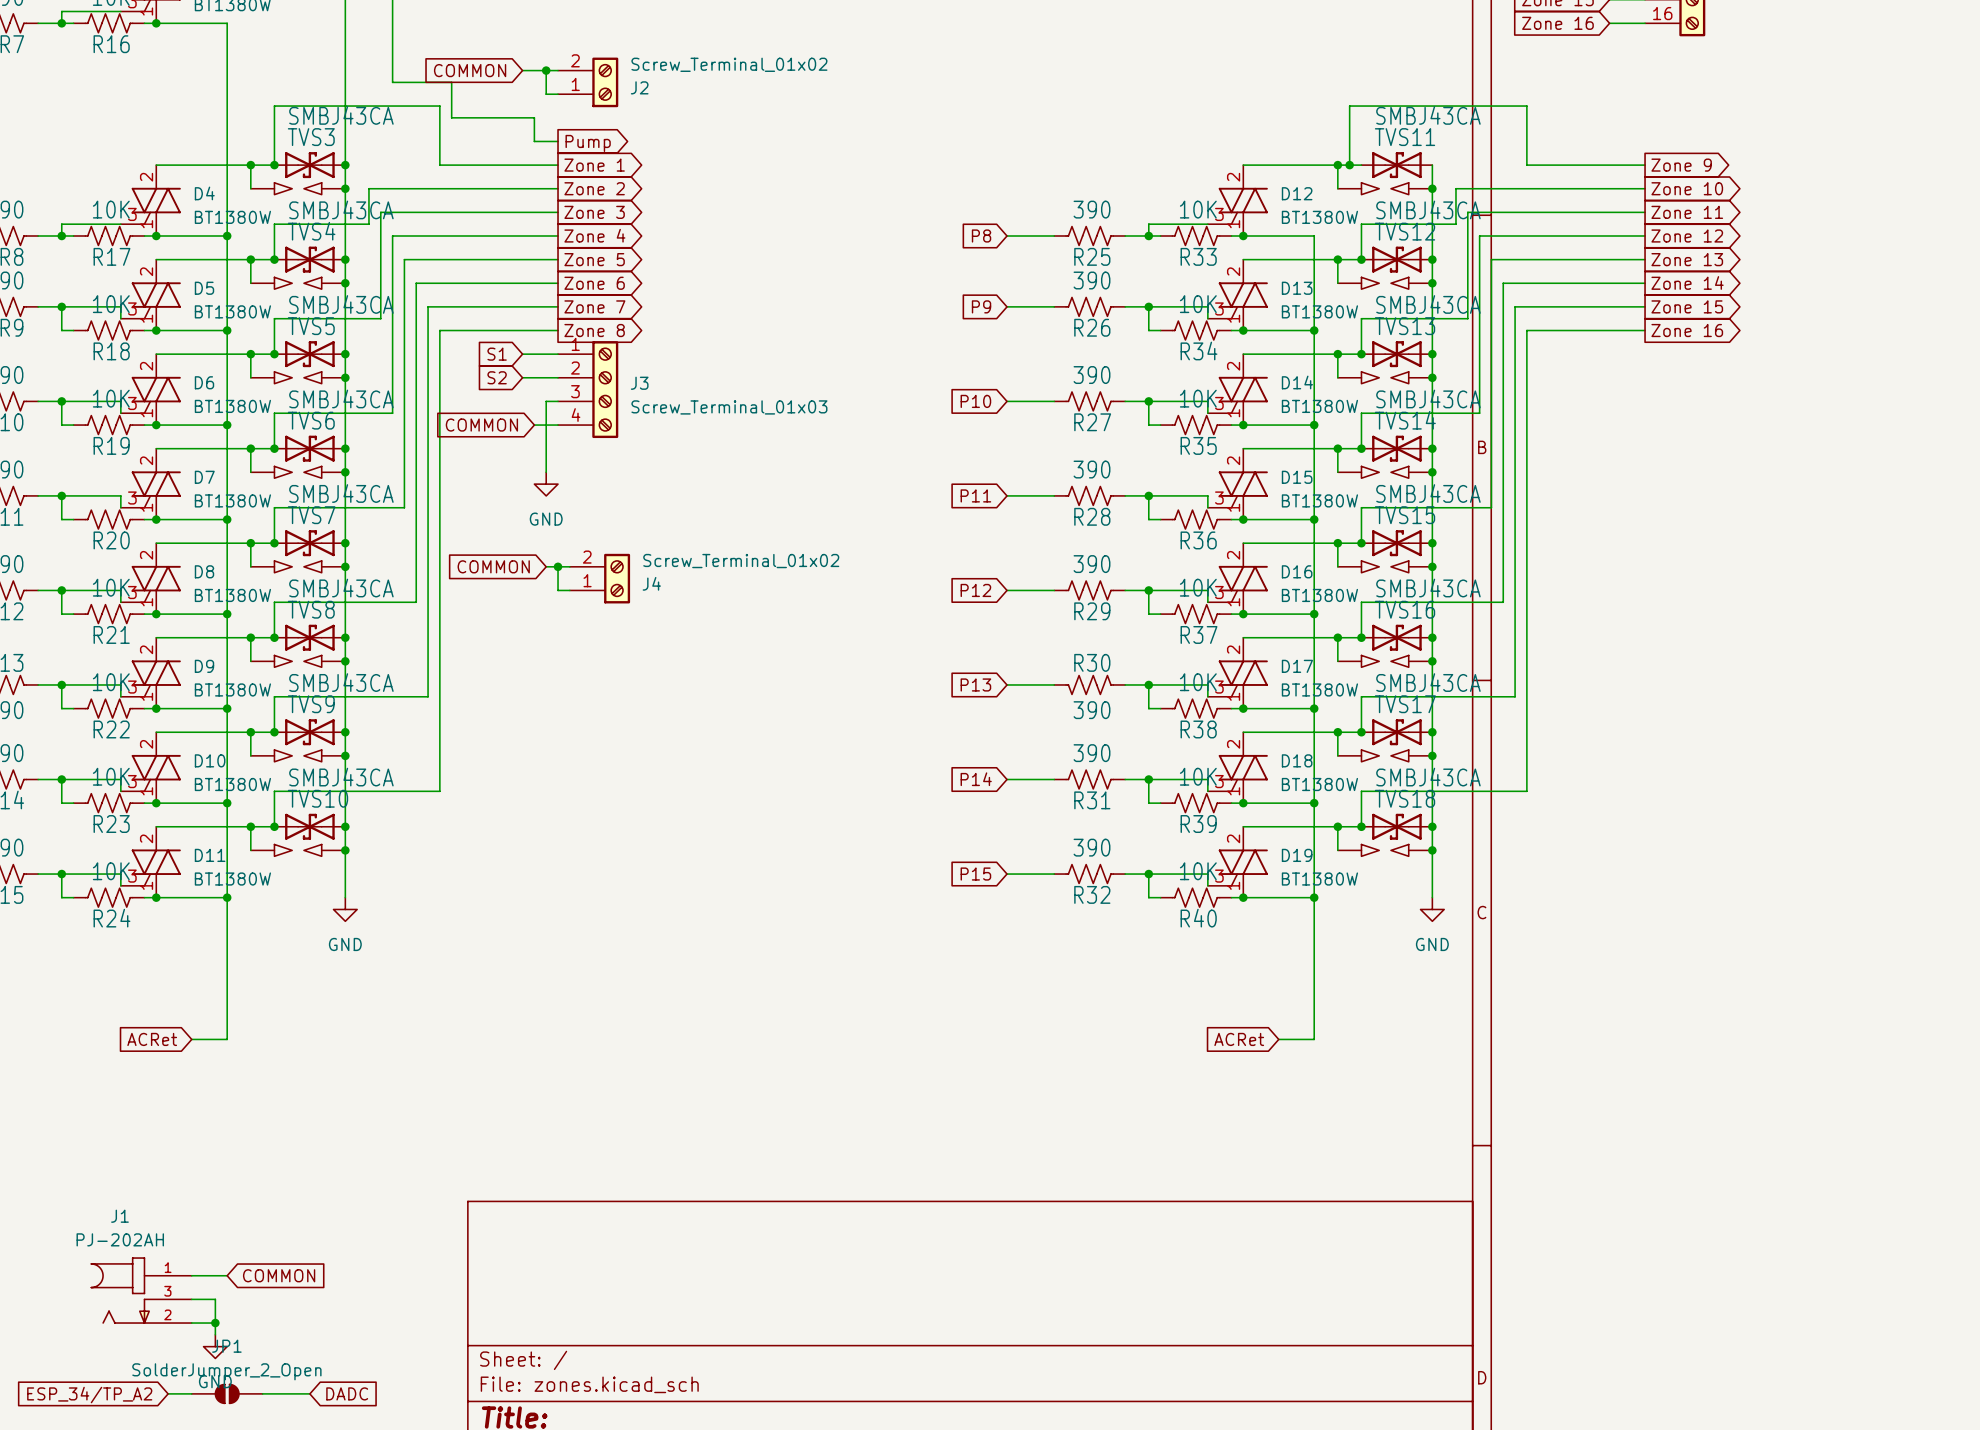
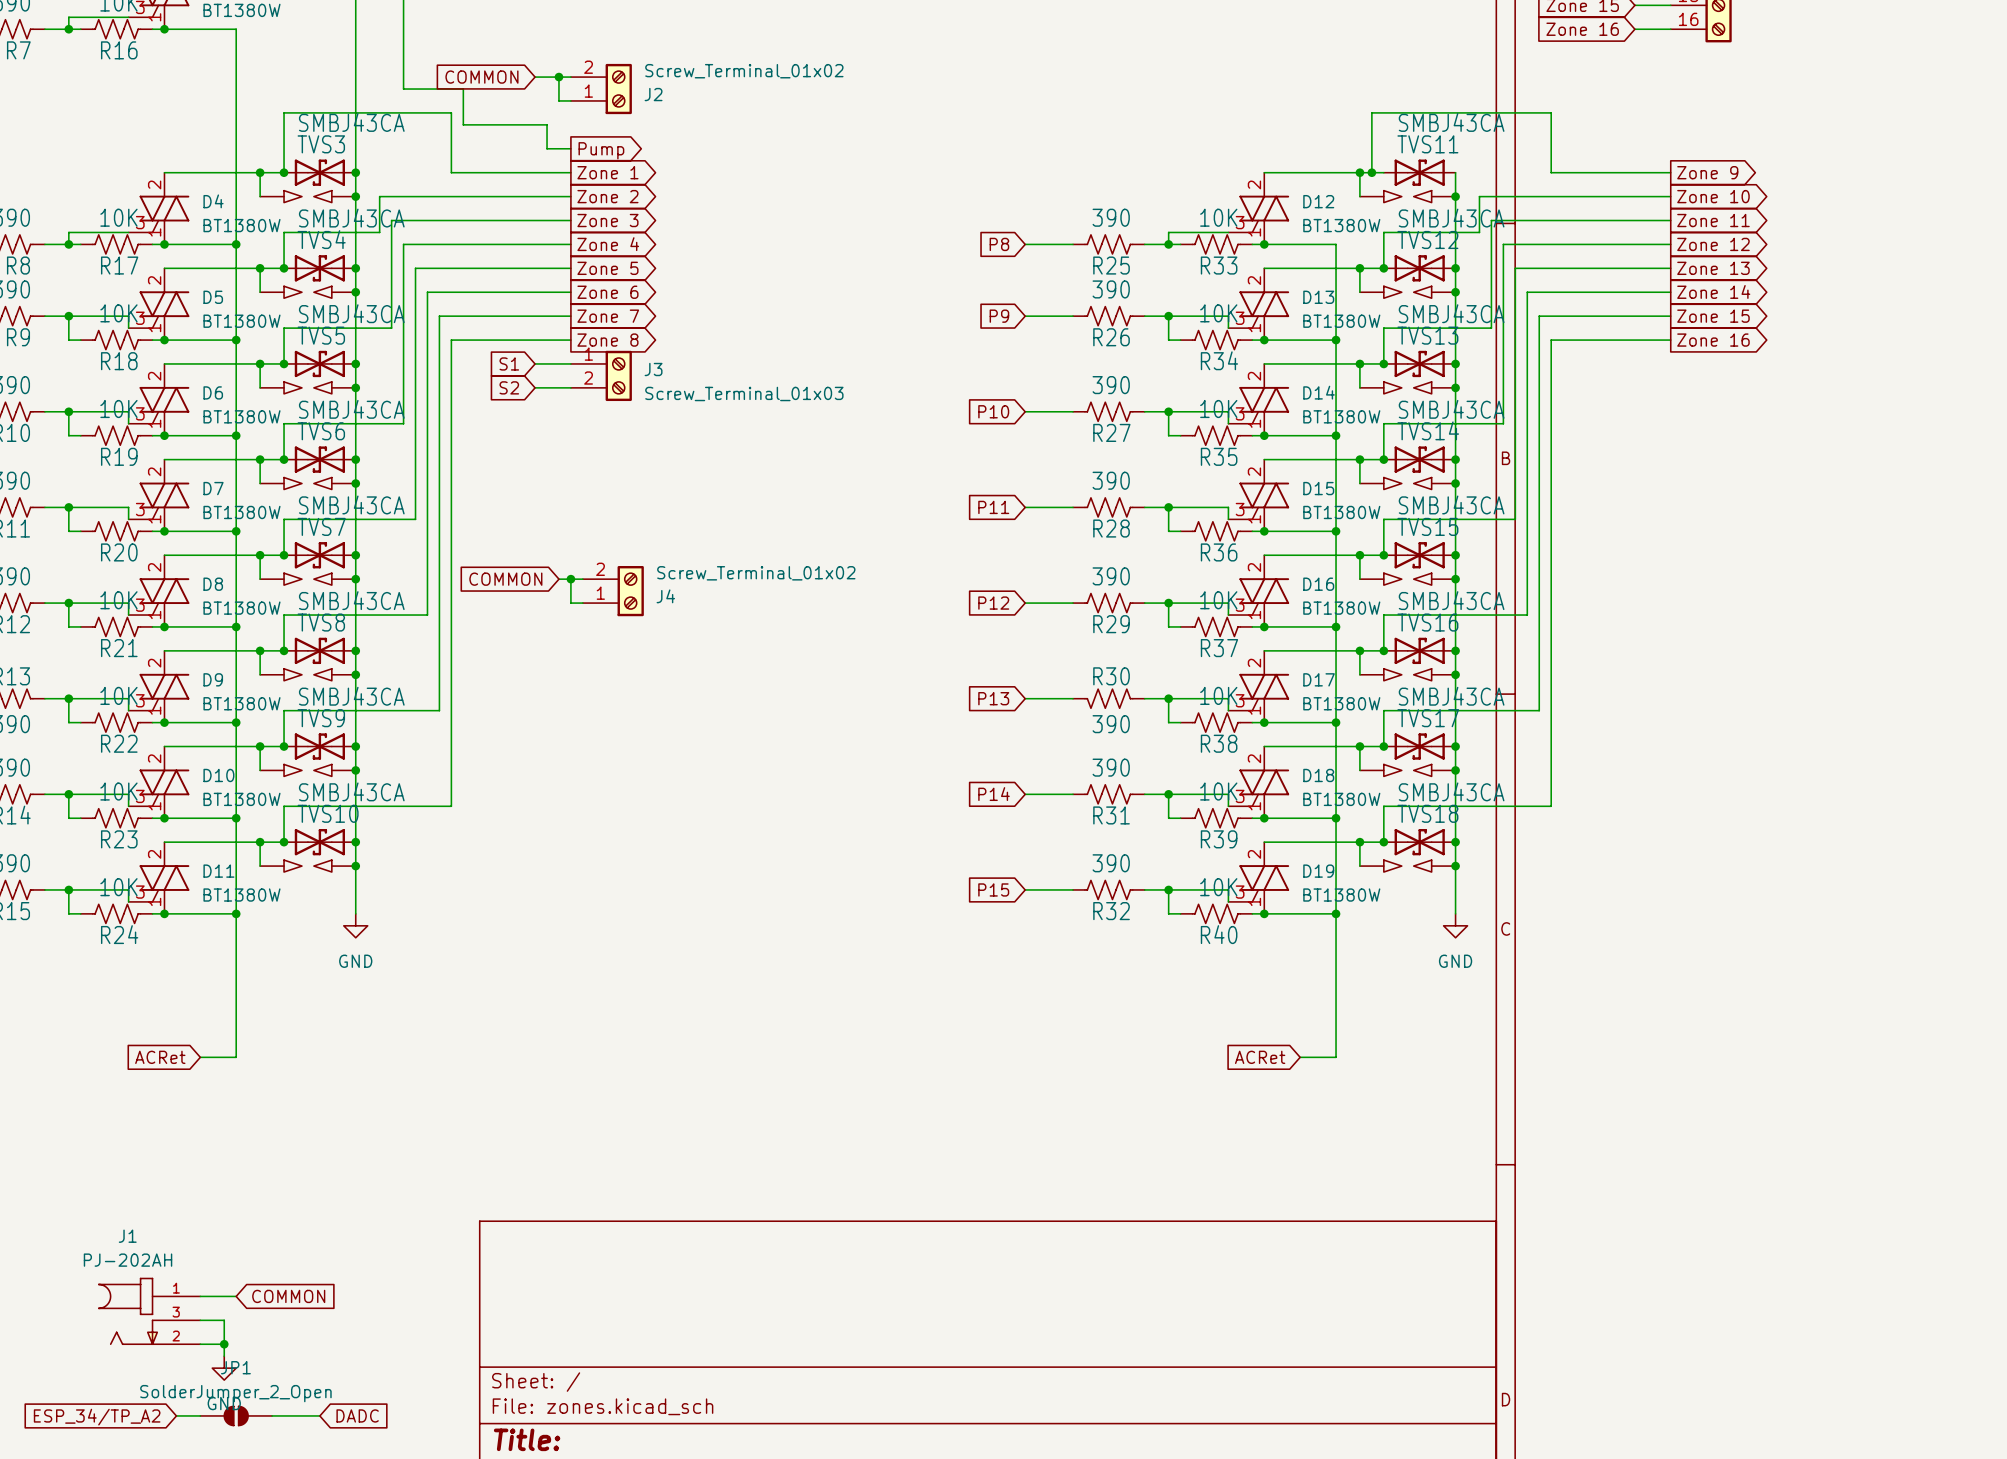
J3 symbol: [558, 341, 619, 439] -> [570, 350, 632, 402]
wire: (558, 401) (546, 401) (546, 472) -> none
global label: COMMON (481, 425) -> none
wire: (534, 425) (558, 425) -> none
power symbol: GND (546, 484) -> none

